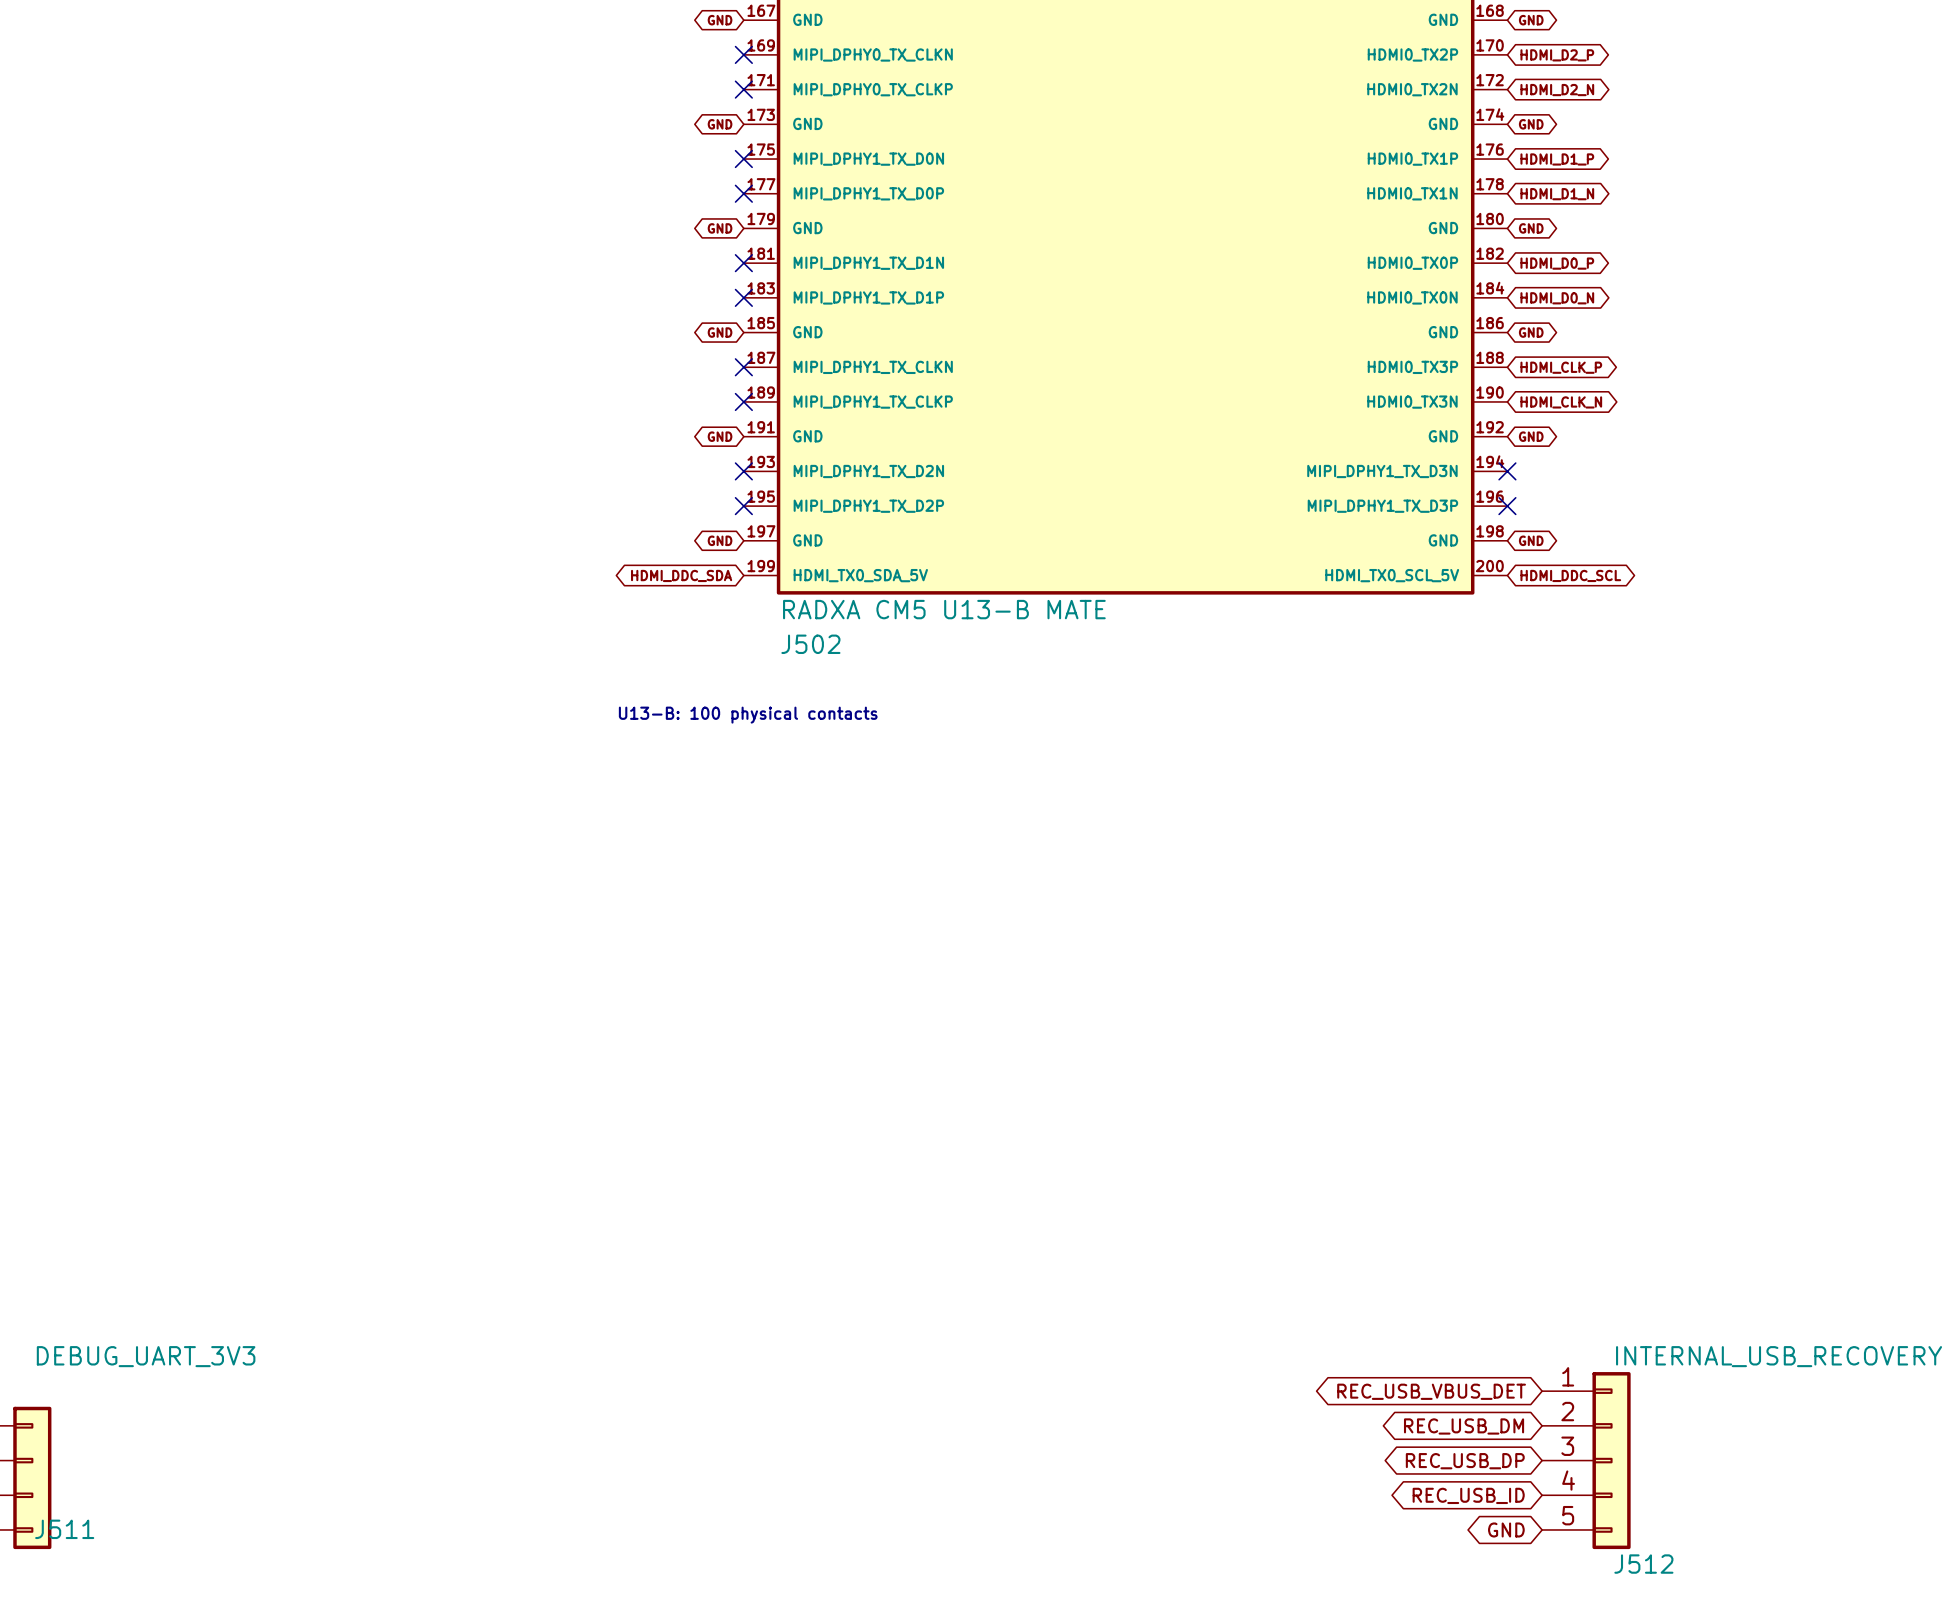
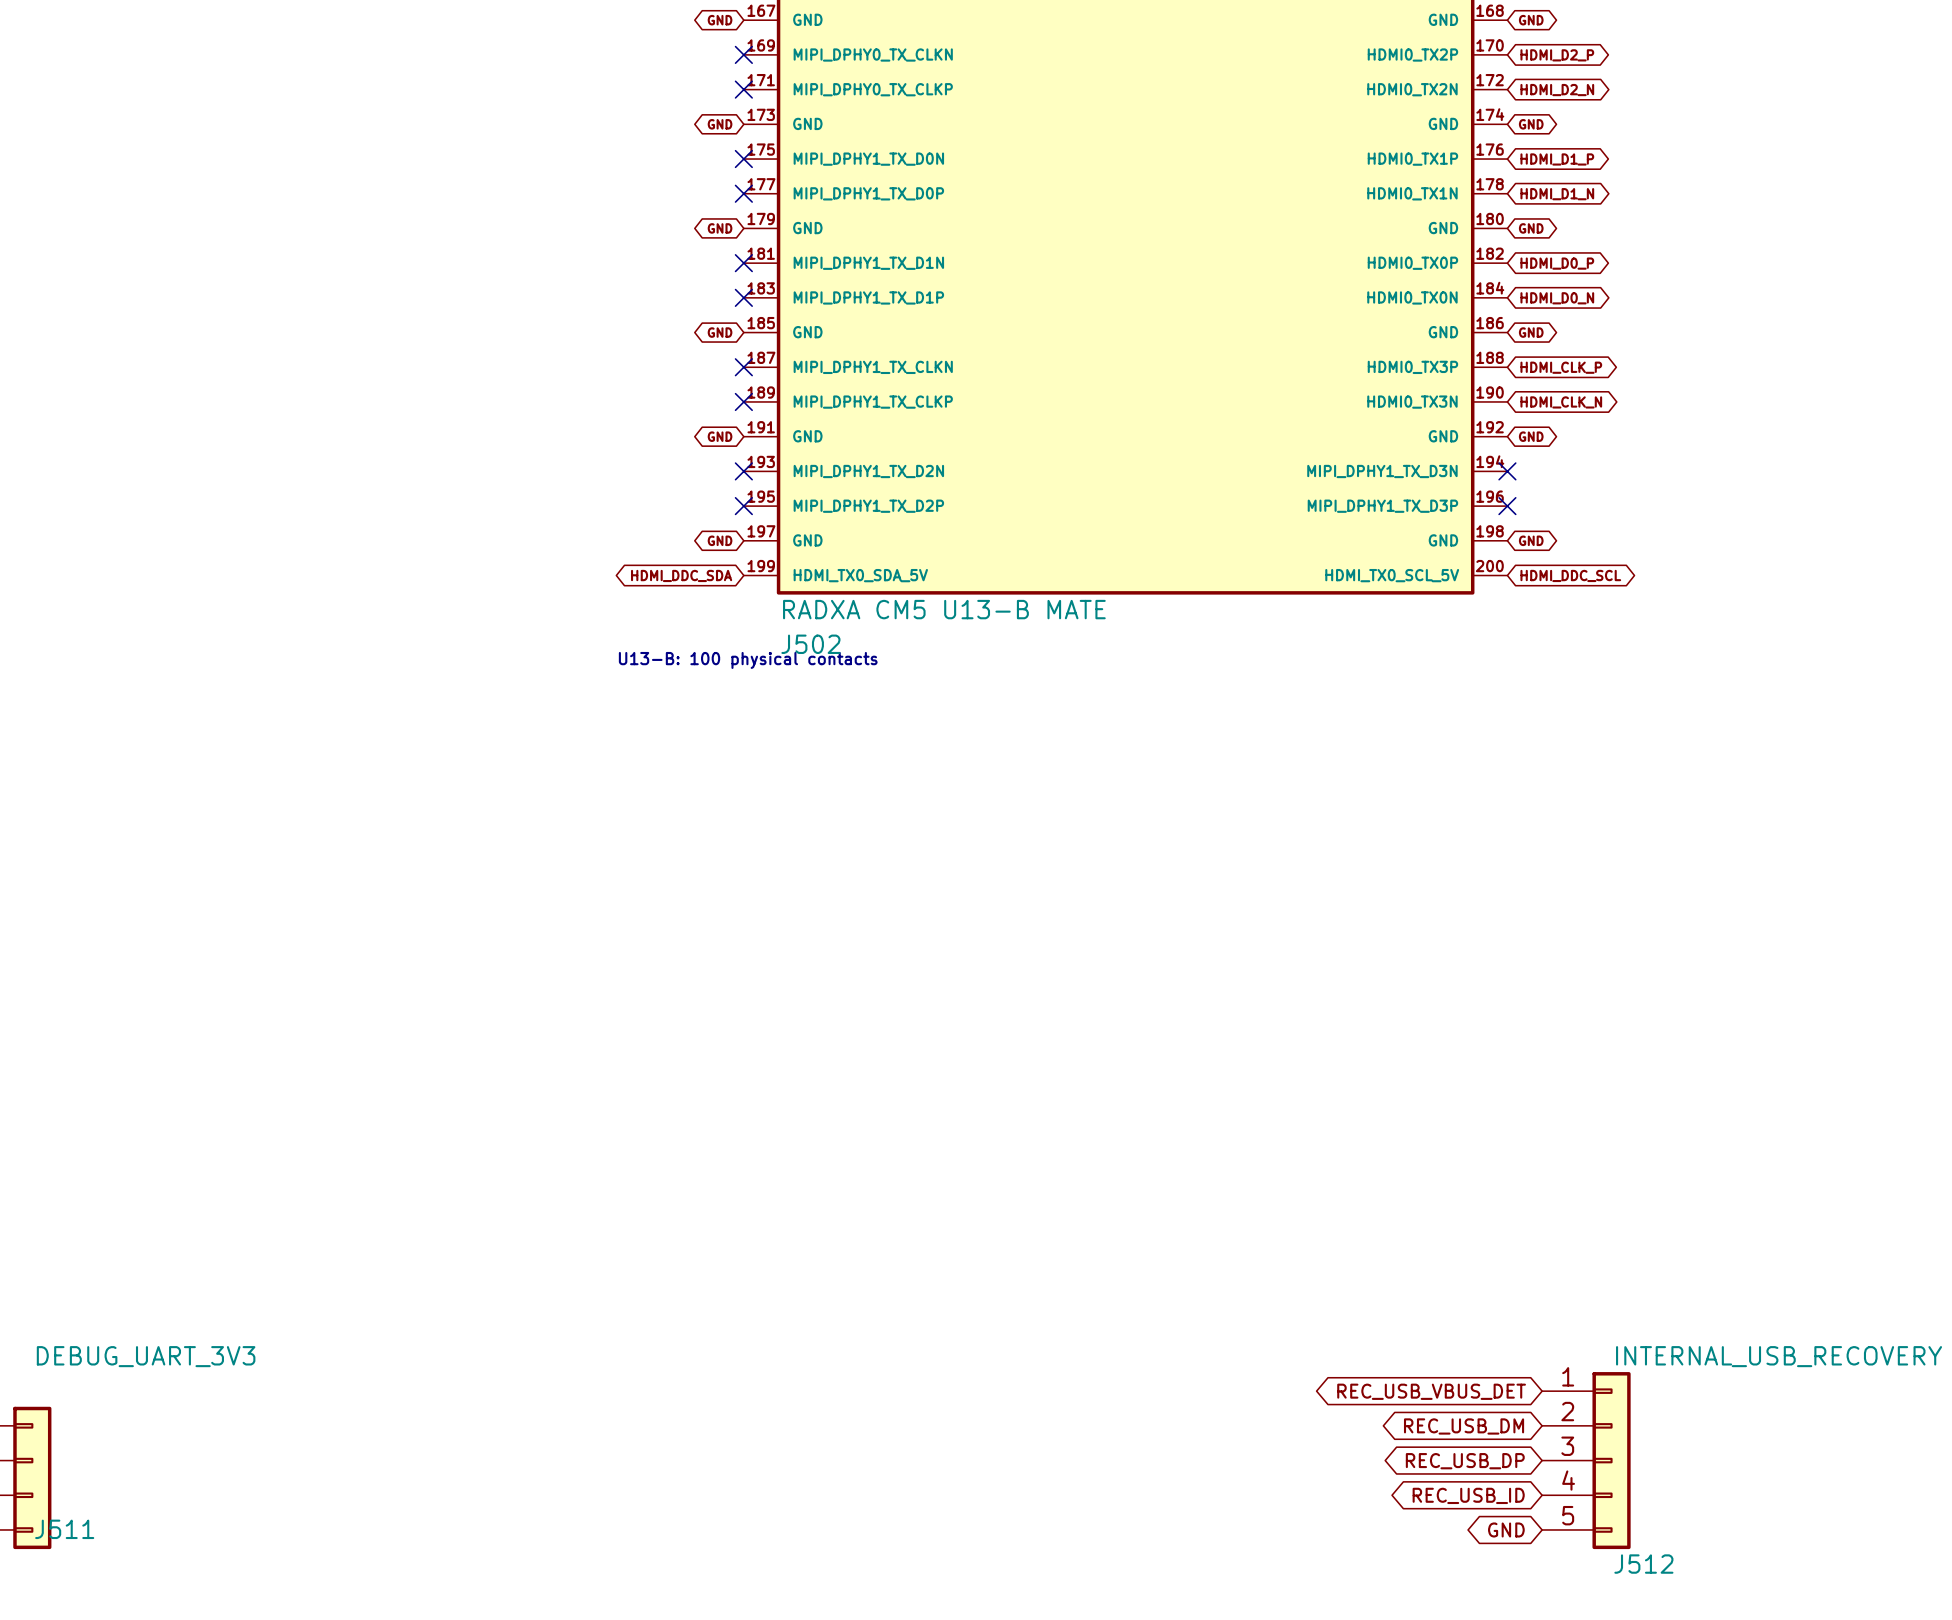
text position: U13-B: 100 physical contacts (748, 715) -> U13-B: 100 physical contacts (748, 660)

